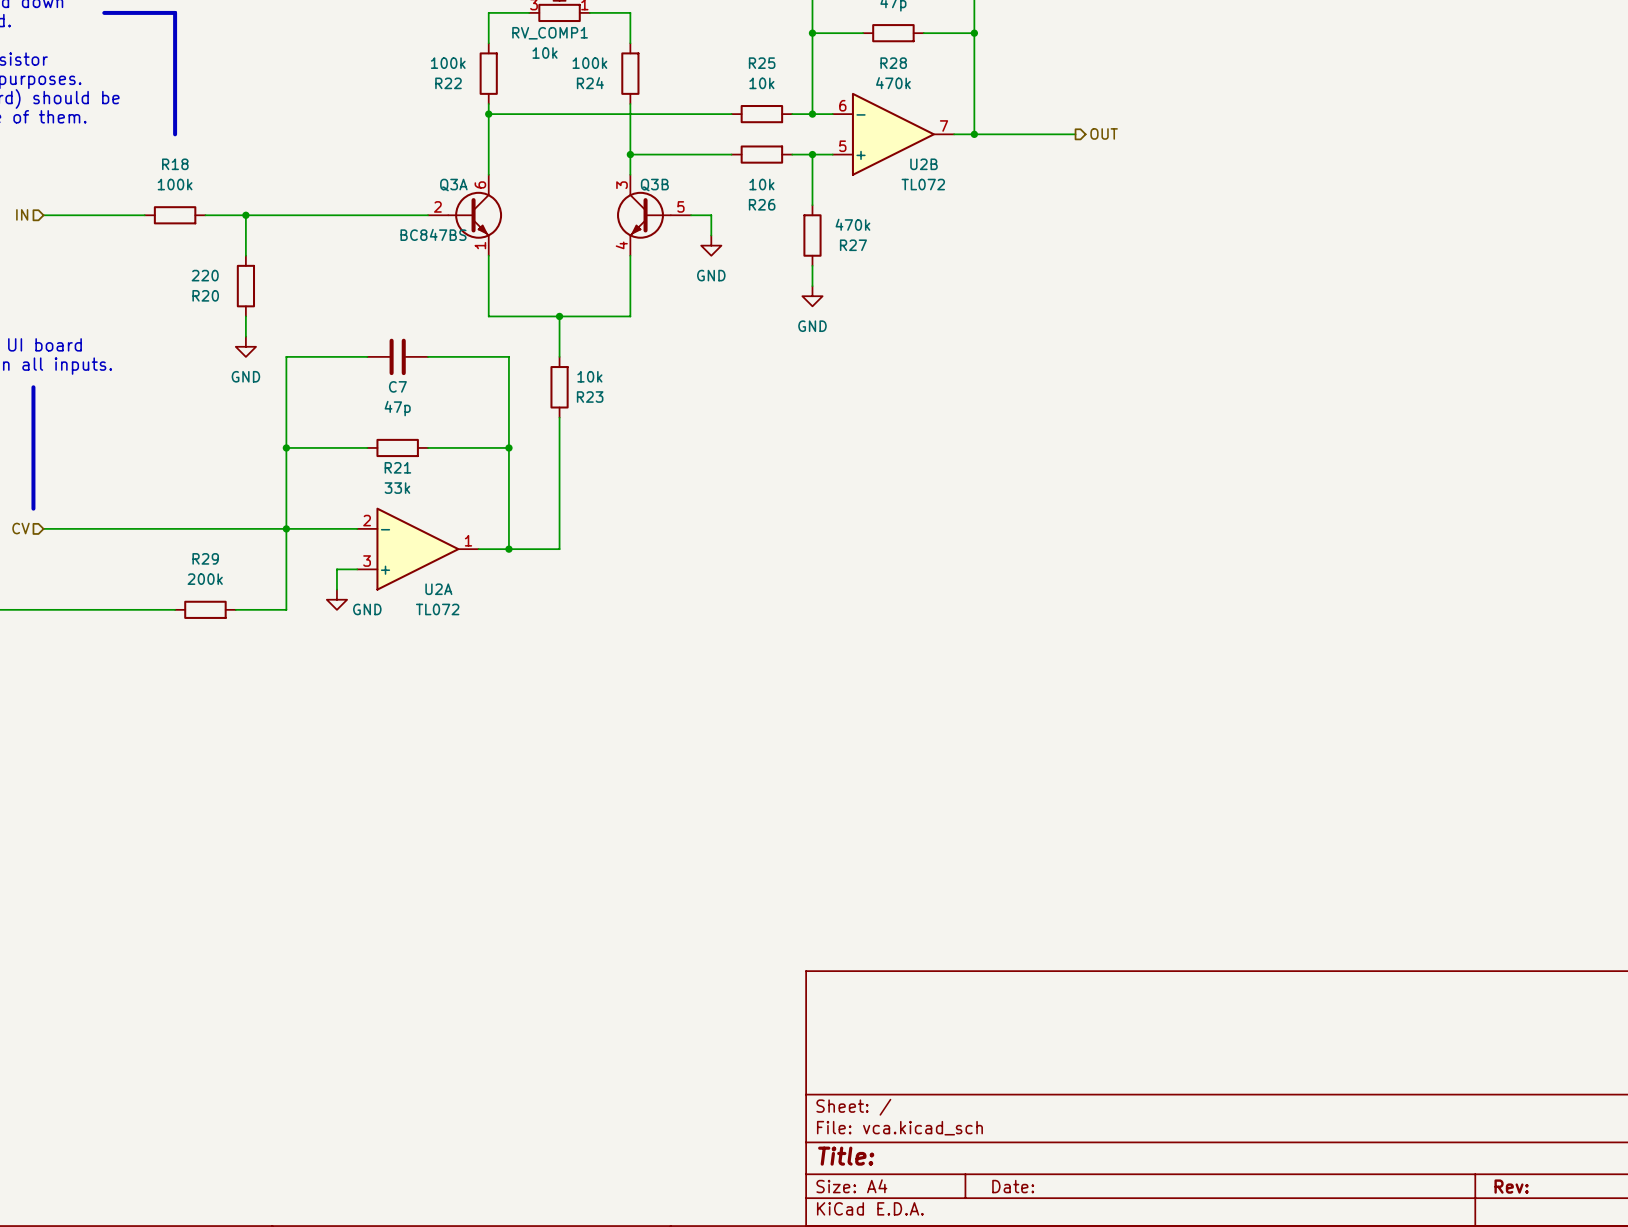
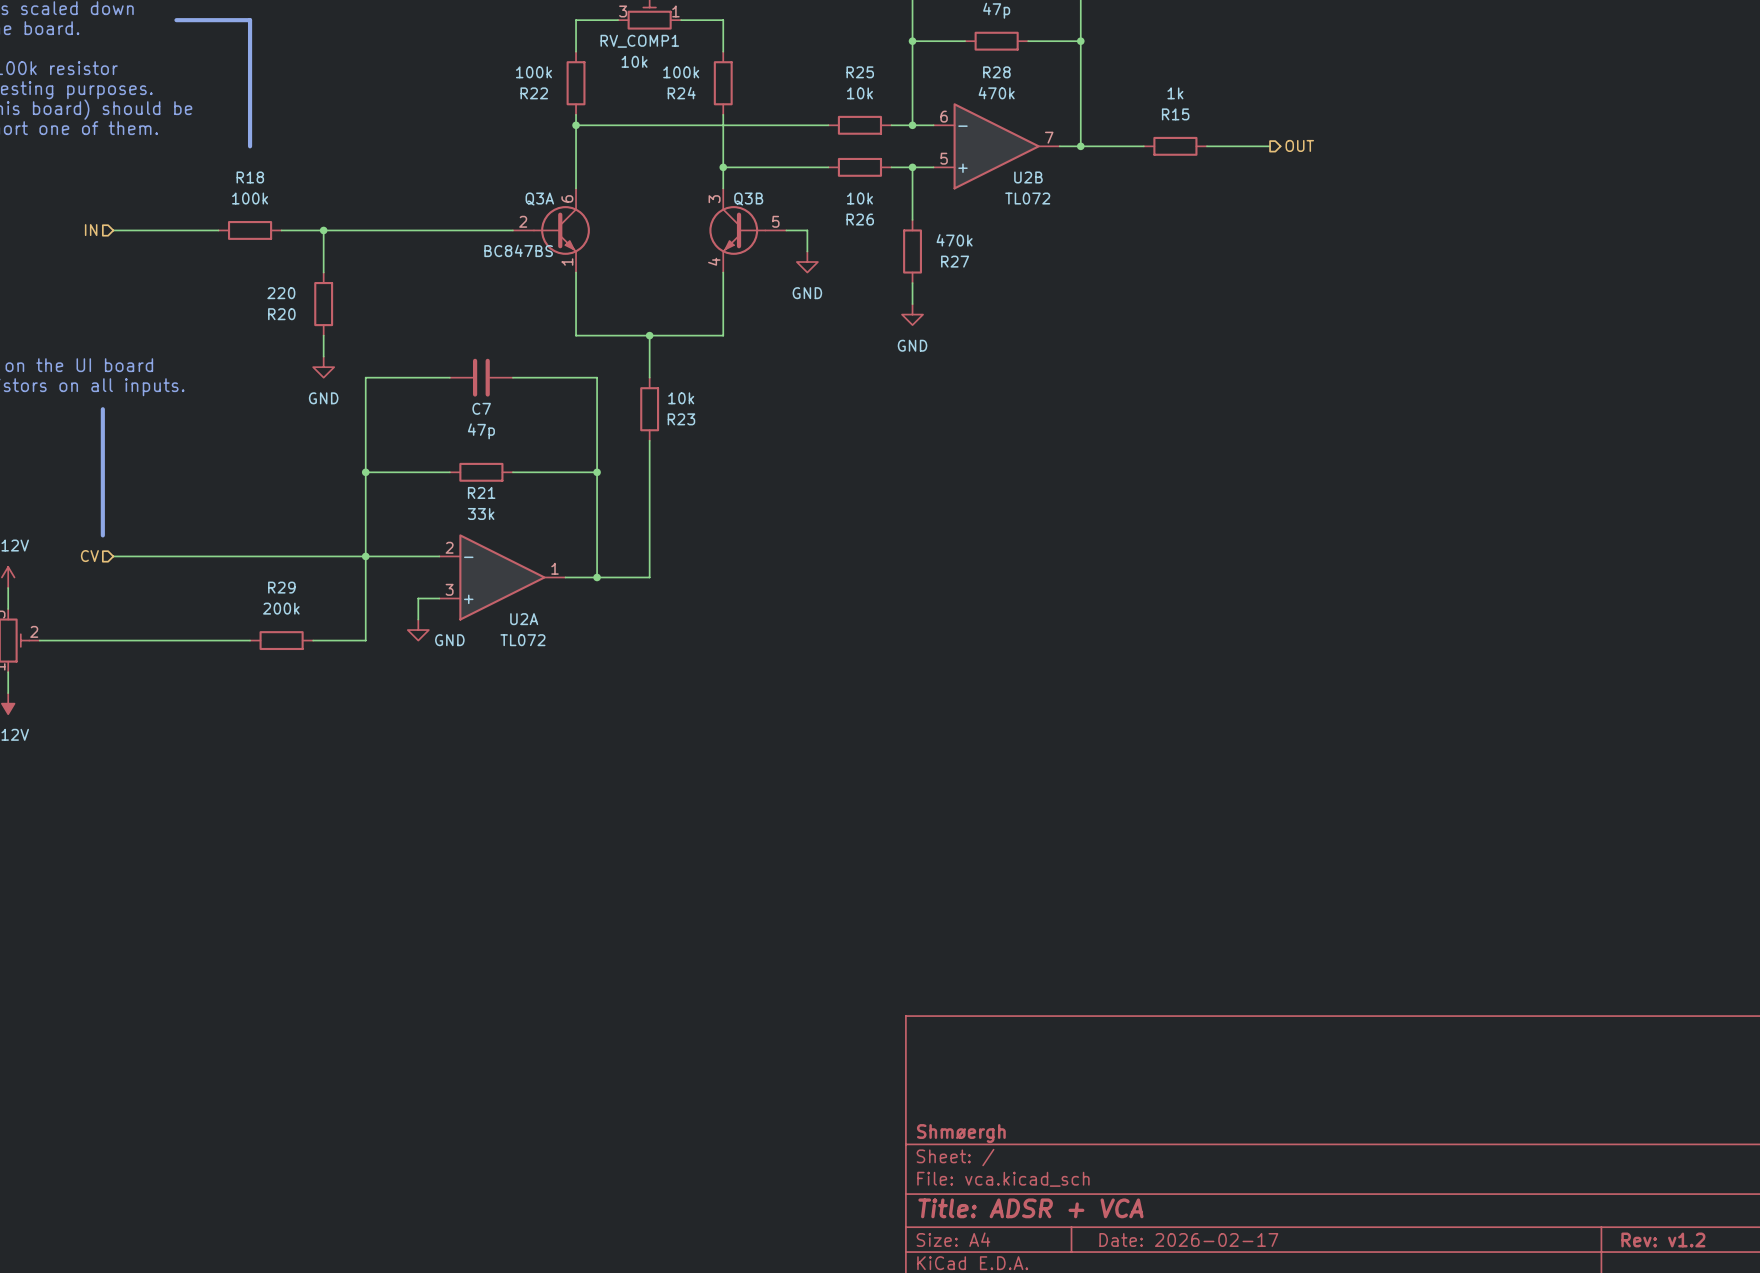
hierarchical label position: OUT (1104, 133) -> OUT (1299, 145)
wire: (1035, 134) (1075, 134) -> none
R15: none -> 1k (1175, 146)
wire: none -> (1206, 146) (1270, 146)
title block: none -> Shmøergh (961, 1133)
title block: Title: (846, 1156) -> Title: ADSR + VCA (1030, 1208)
title block: Date: (1013, 1186) -> Date: 2026-02-17 (1188, 1239)
title block: Rev: (1511, 1186) -> Rev: v1.2 (1663, 1239)

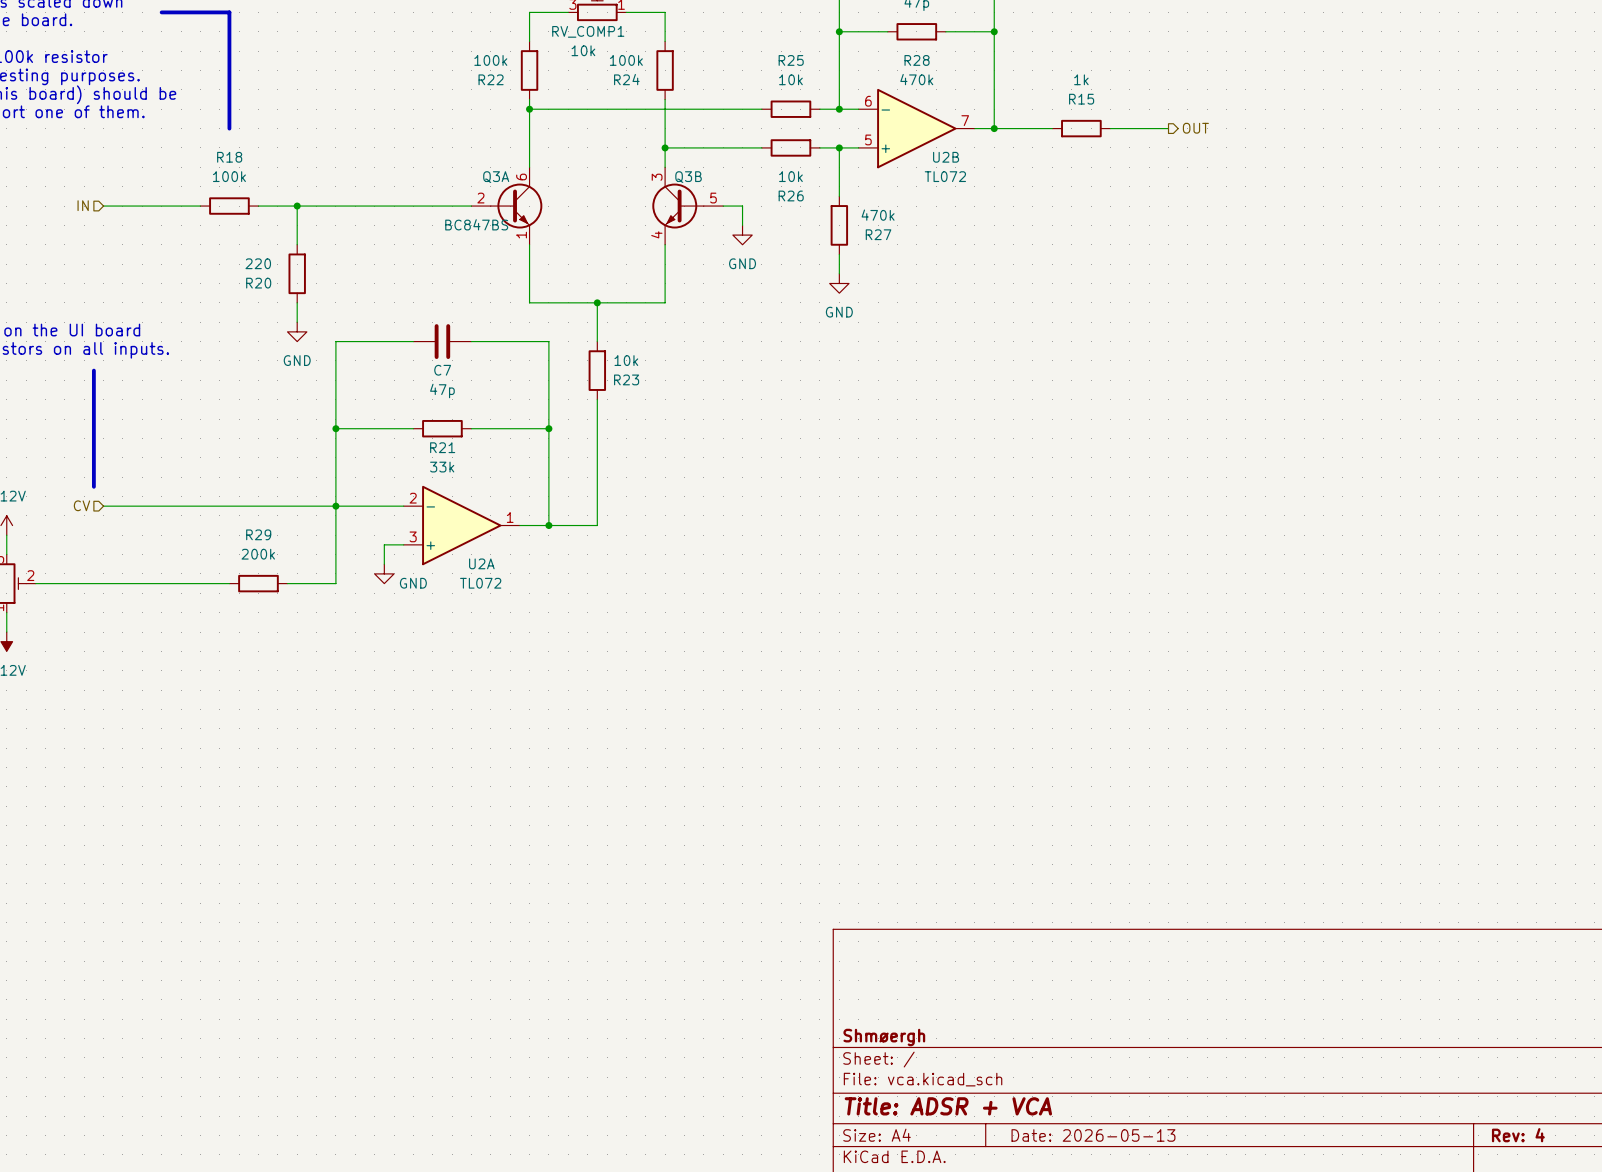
title block: Date: 2026-02-17 (1188, 1239) -> Date: 2026-05-13 (1093, 1135)
title block: Rev: v1.2 (1663, 1239) -> Rev: 4 (1518, 1135)

